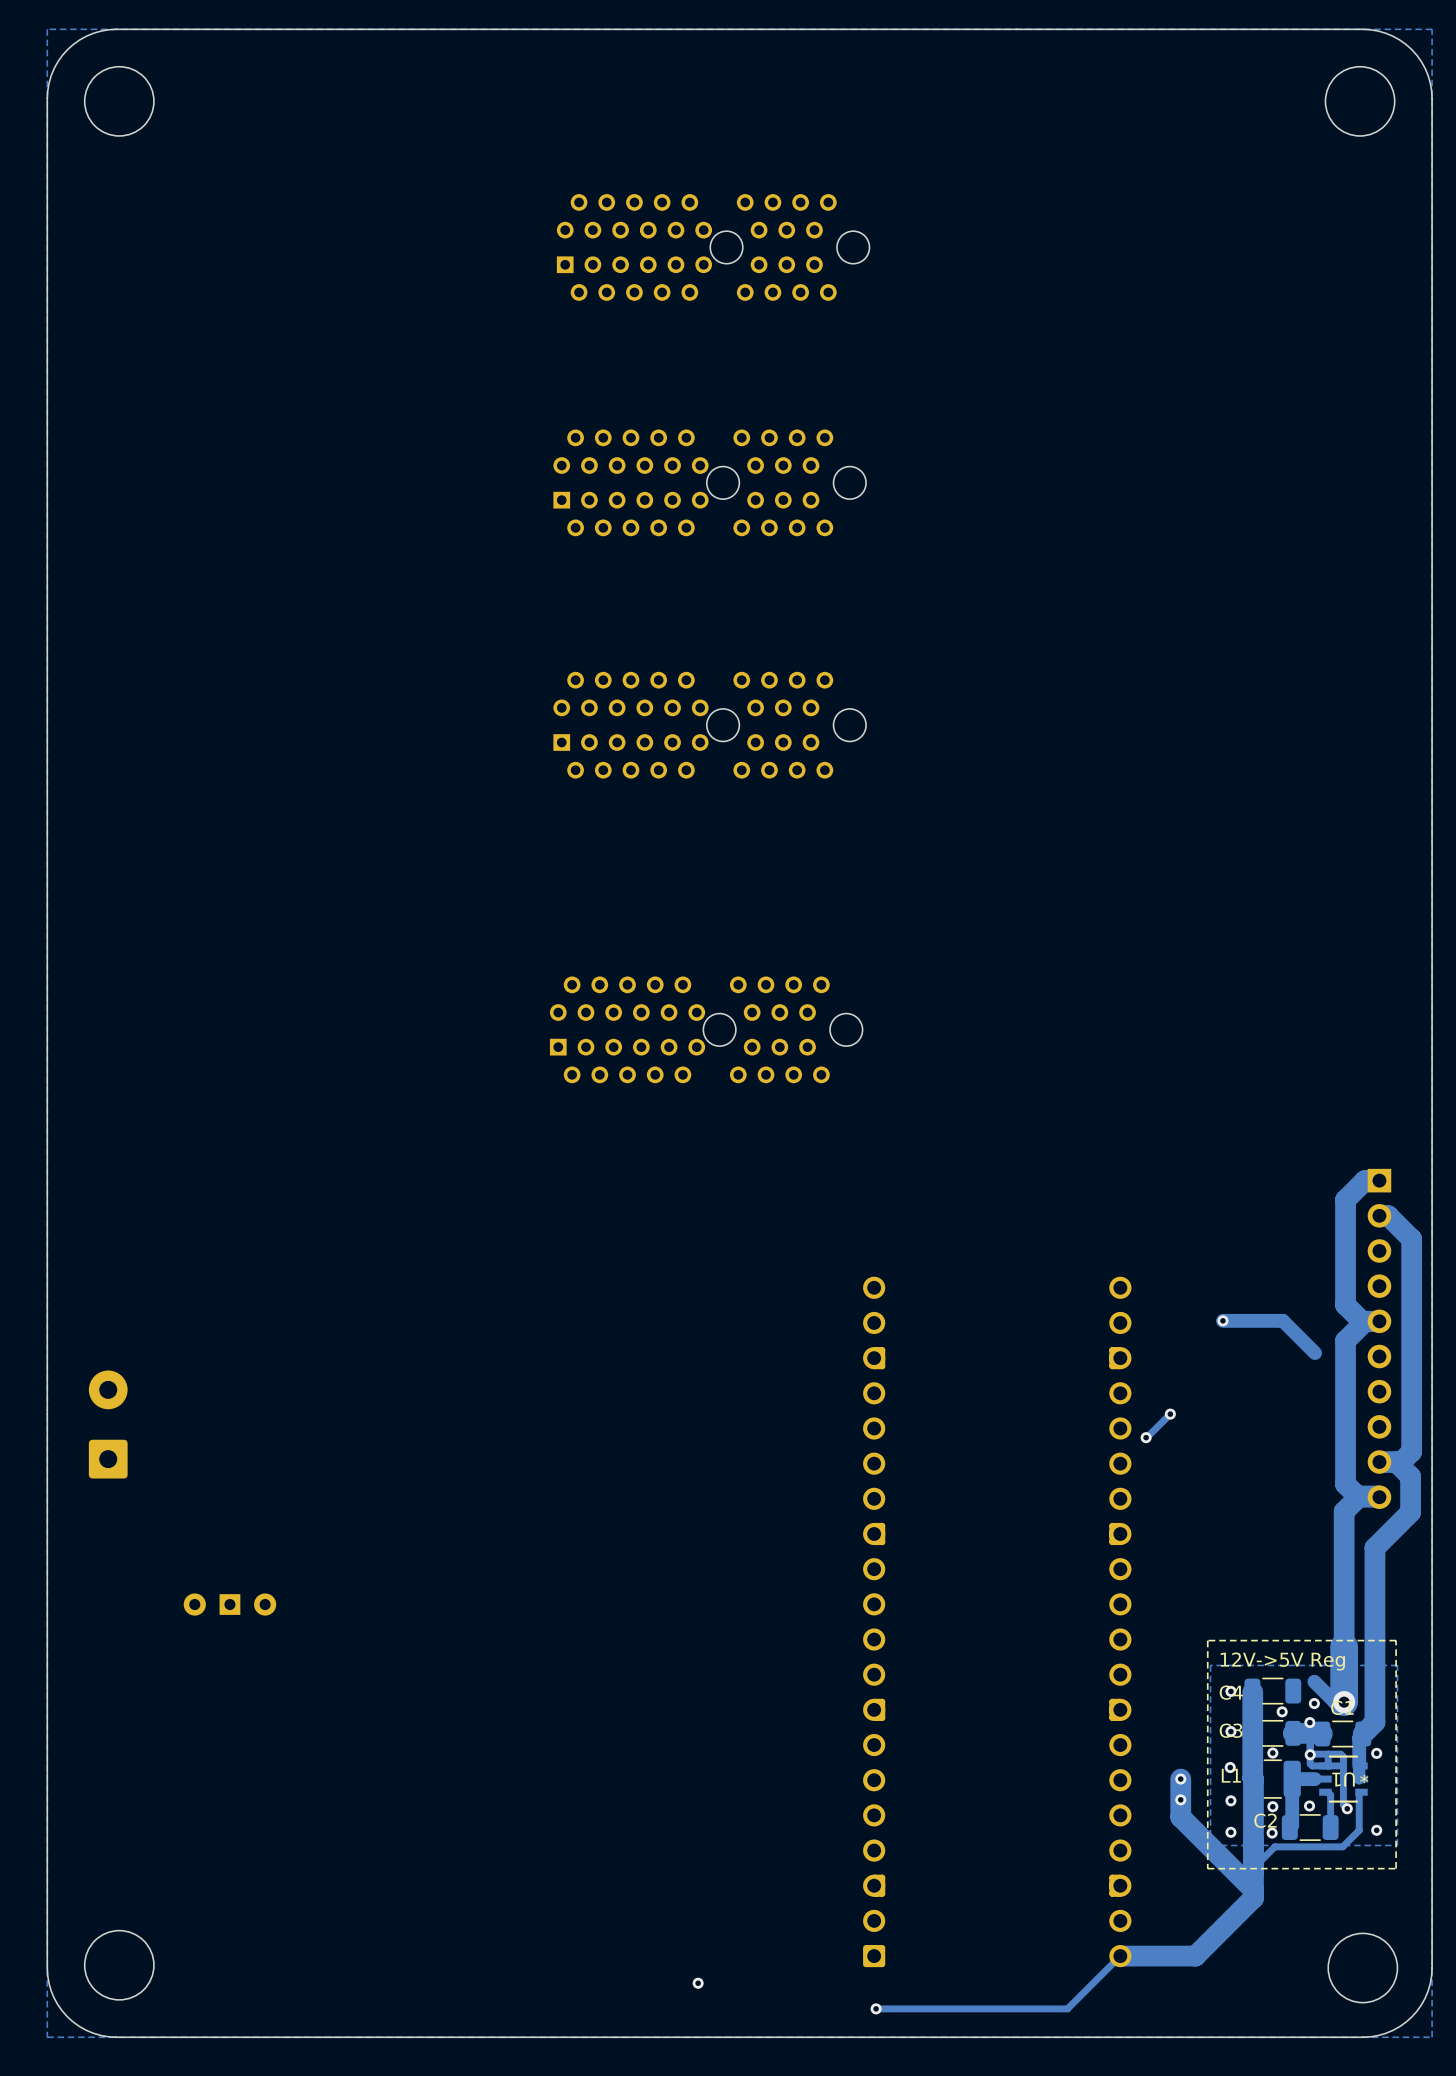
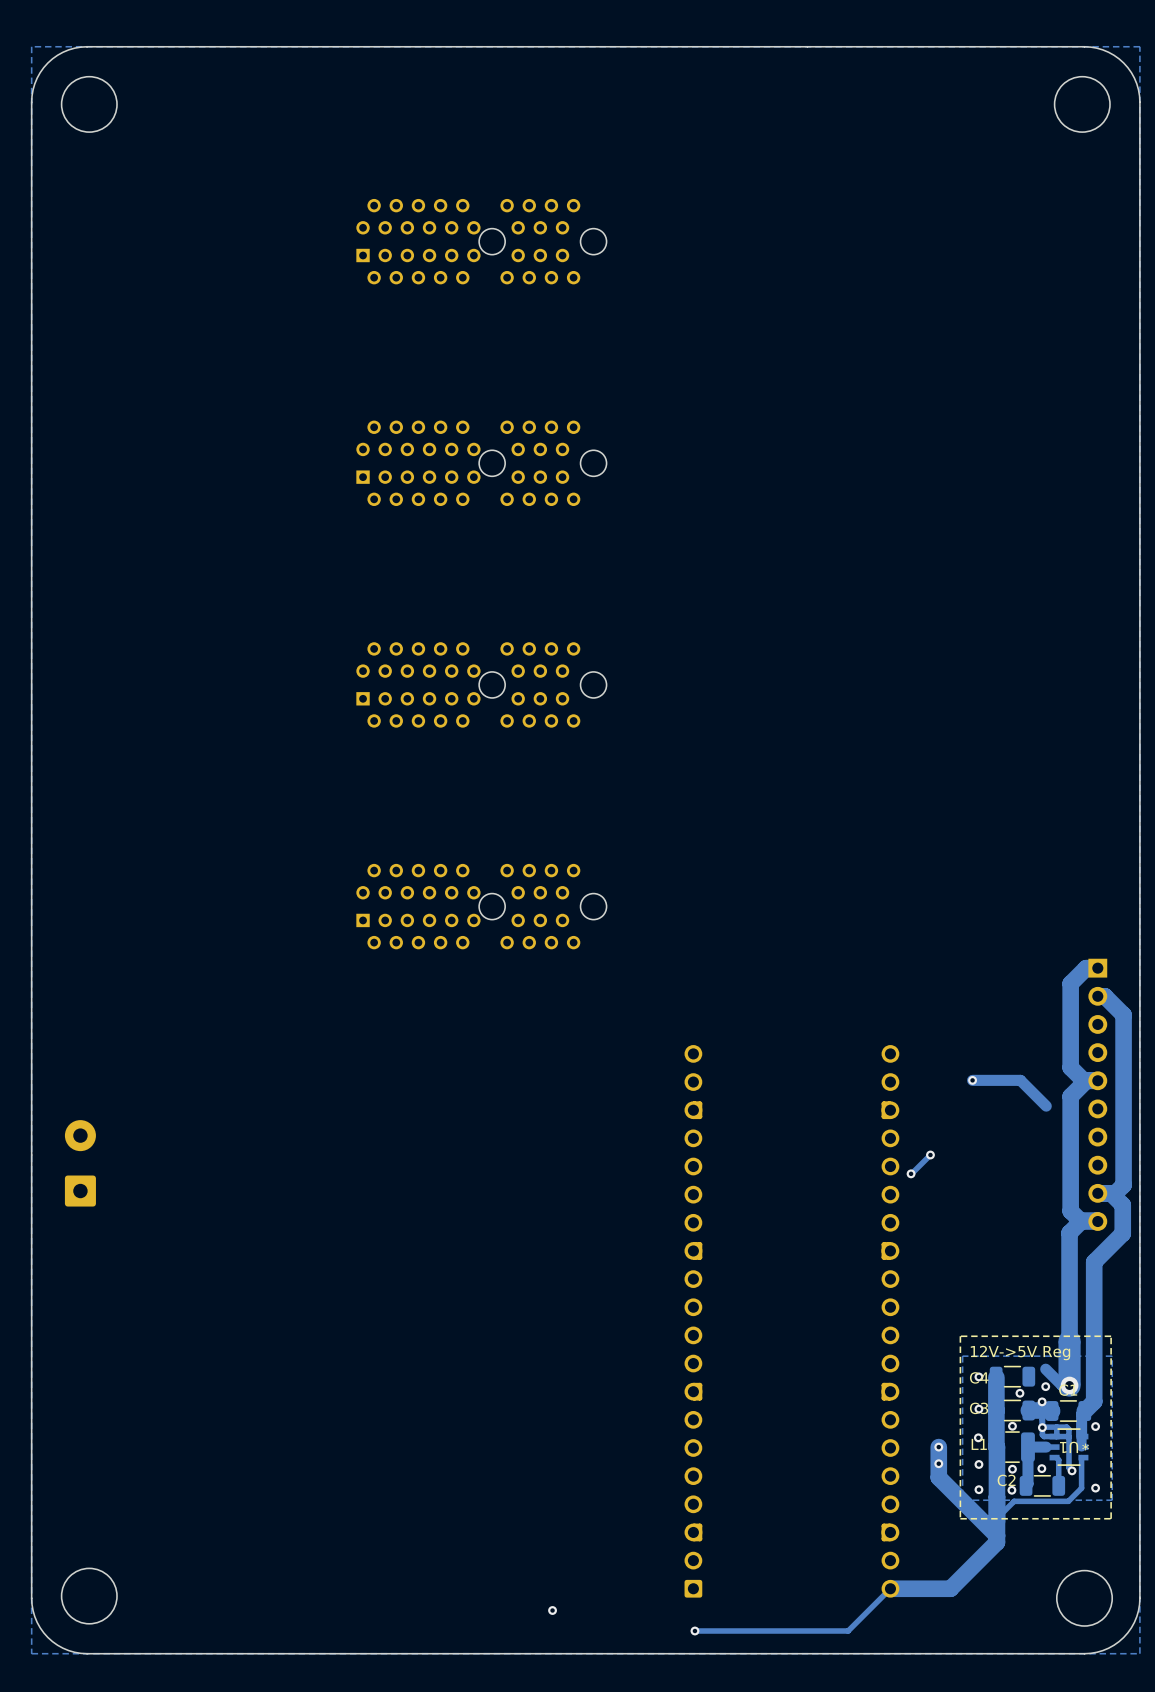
part position: (713, 247) -> (481, 241)
part: (709, 482) -> none
part: none -> (481, 463)
part: (709, 725) -> none
part: none -> (481, 684)
part: (706, 1029) -> none
part: none -> (481, 906)
part: (229, 1604) -> none

